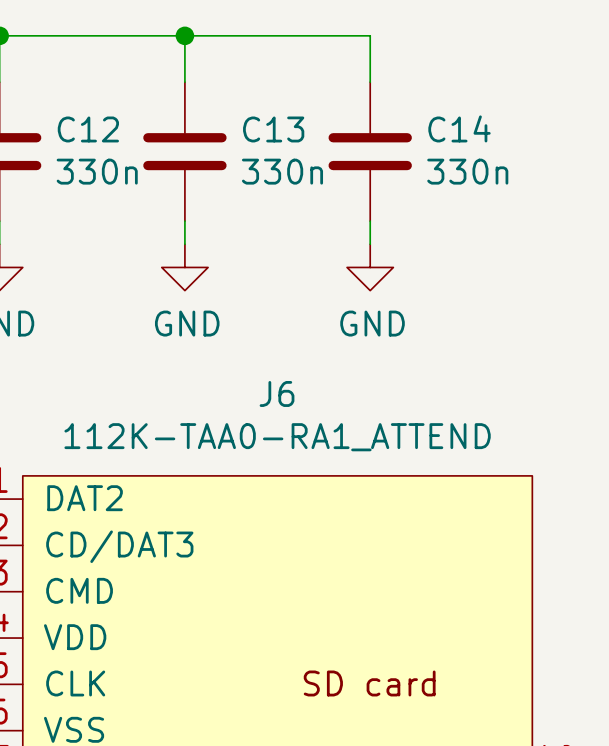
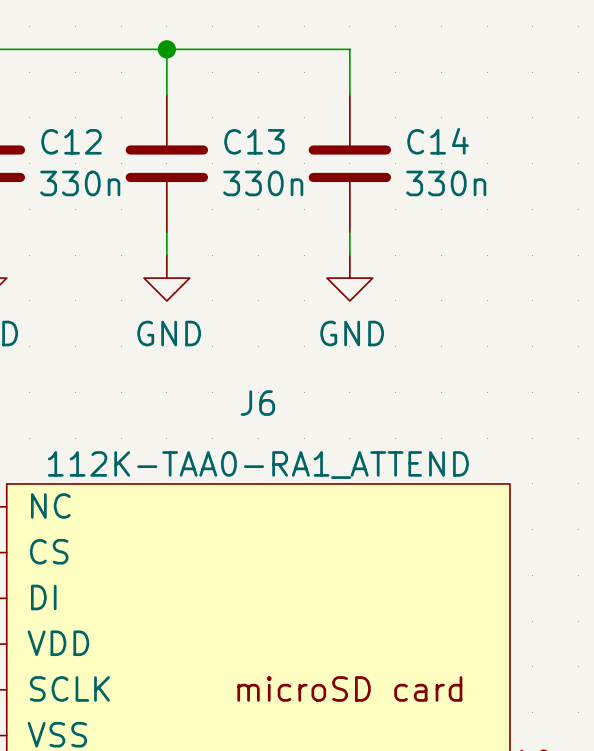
J6 value position: 112K-TAA0-RA1_ATTEND (277, 437) -> 112K-TAA0-RA1_ATTEND (258, 465)
J6 pin name: DAT2 (85, 498) -> NC (50, 505)
J6 pin name: CD/DAT3 (119, 546) -> CS (49, 551)
J6 pin name: CMD (79, 590) -> DI (43, 597)
J6 pin name: CLK (75, 683) -> SCLK (69, 688)
J6 text: SD card (369, 683) -> microSD card (349, 688)

